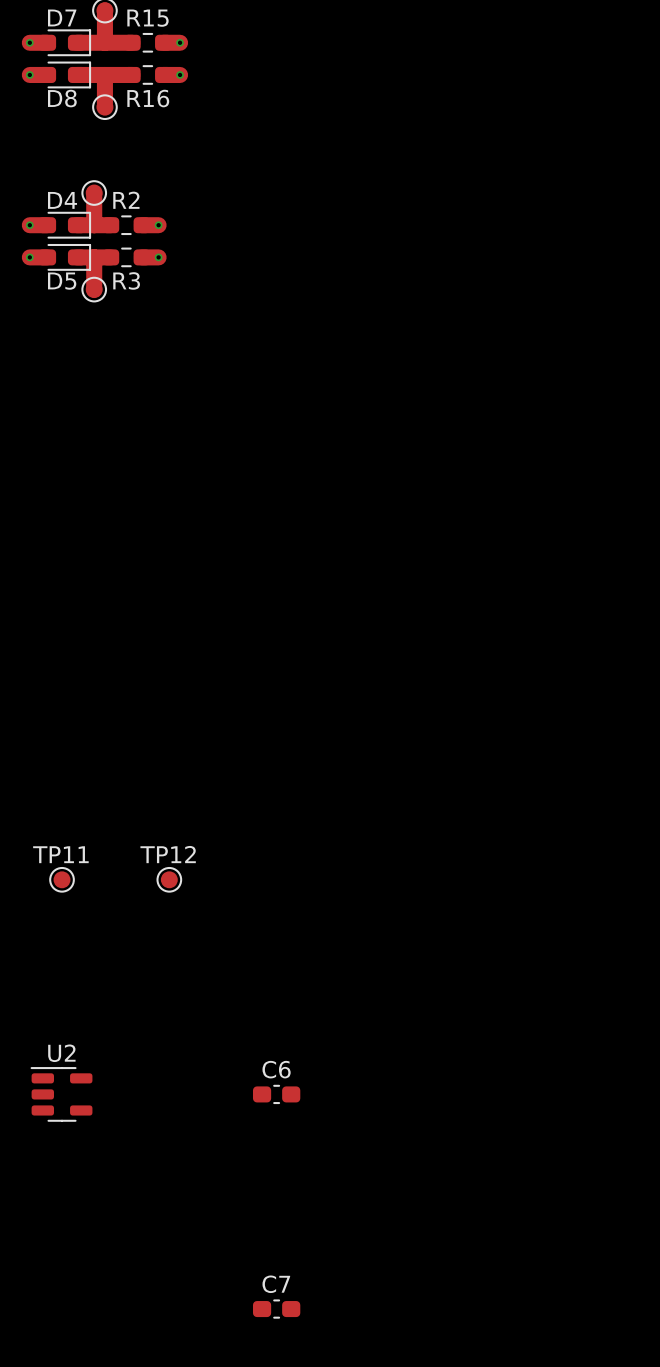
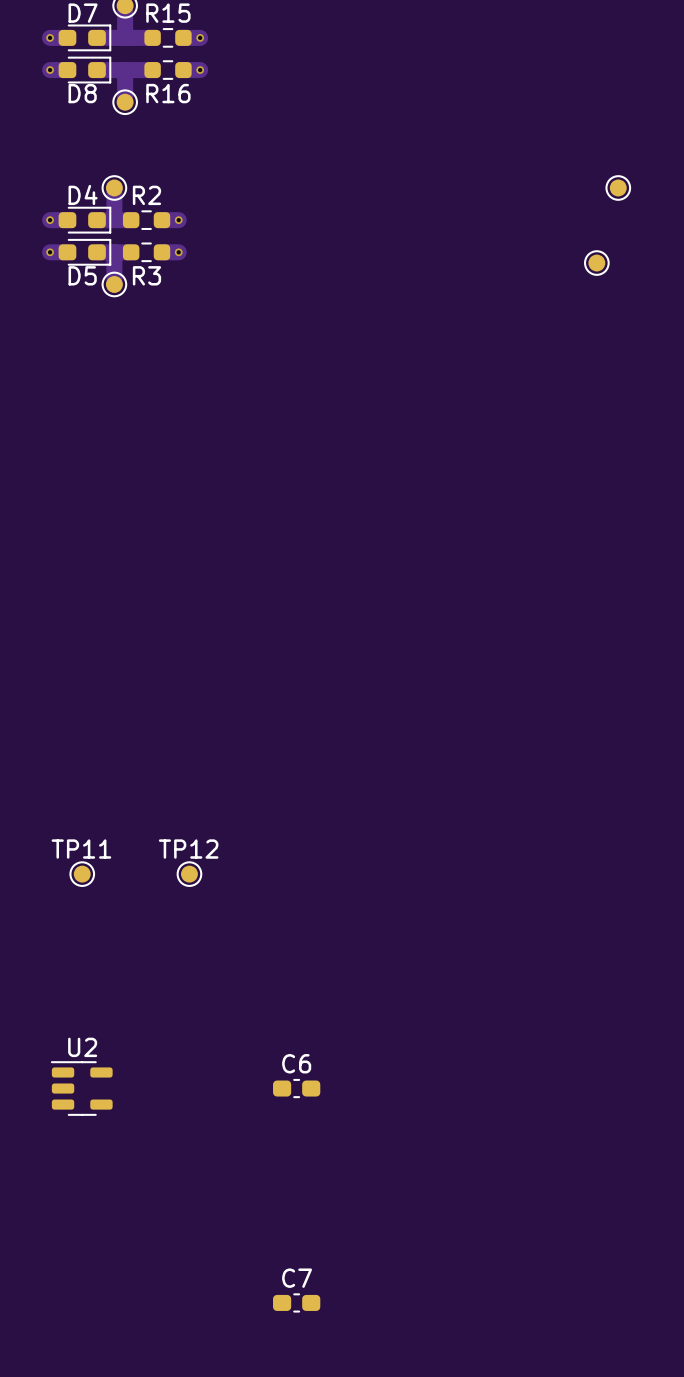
part: none -> (618, 187)
part: none -> (596, 263)

